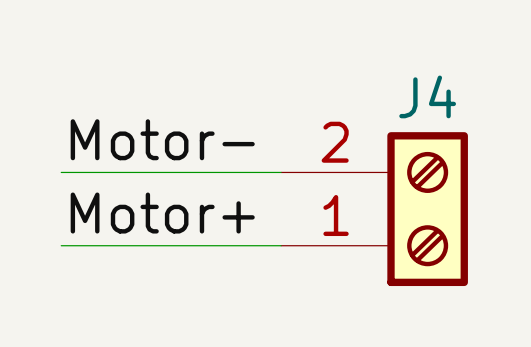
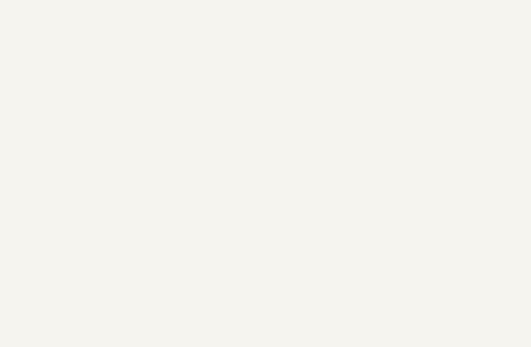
label: Motor- (162, 139) -> none
wire: (61, 172) (281, 172) -> none
J4: (374, 209) -> none
label: Motor+ (162, 213) -> none
wire: (61, 245) (281, 245) -> none

